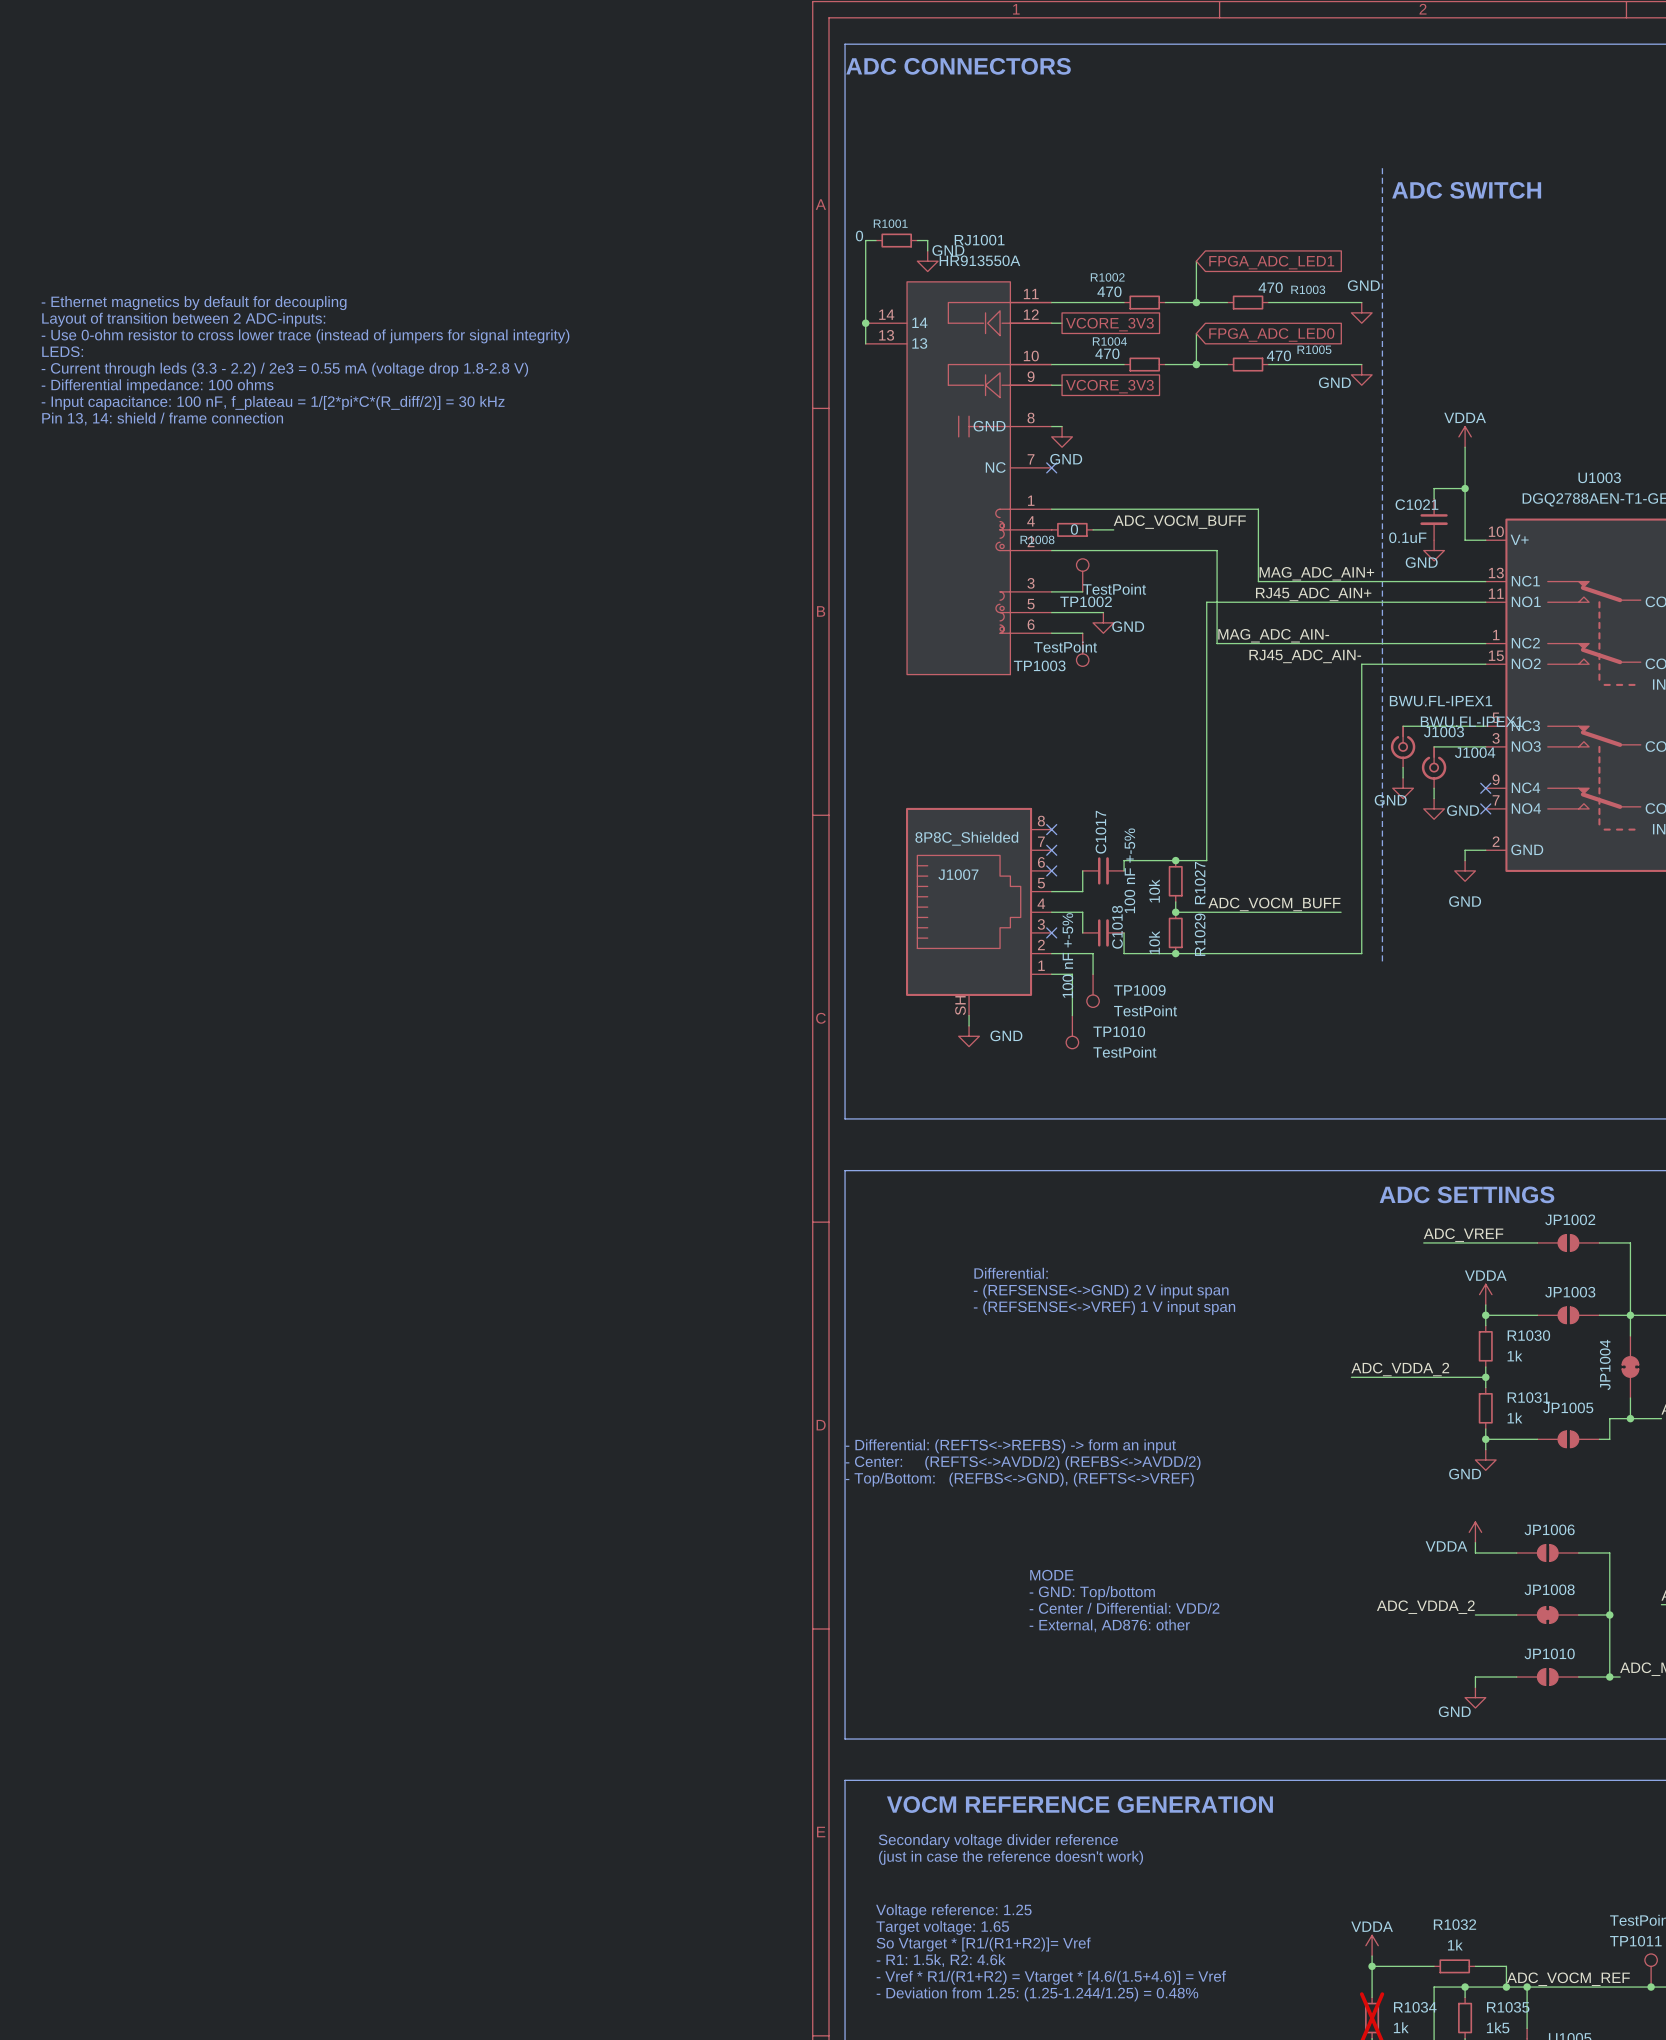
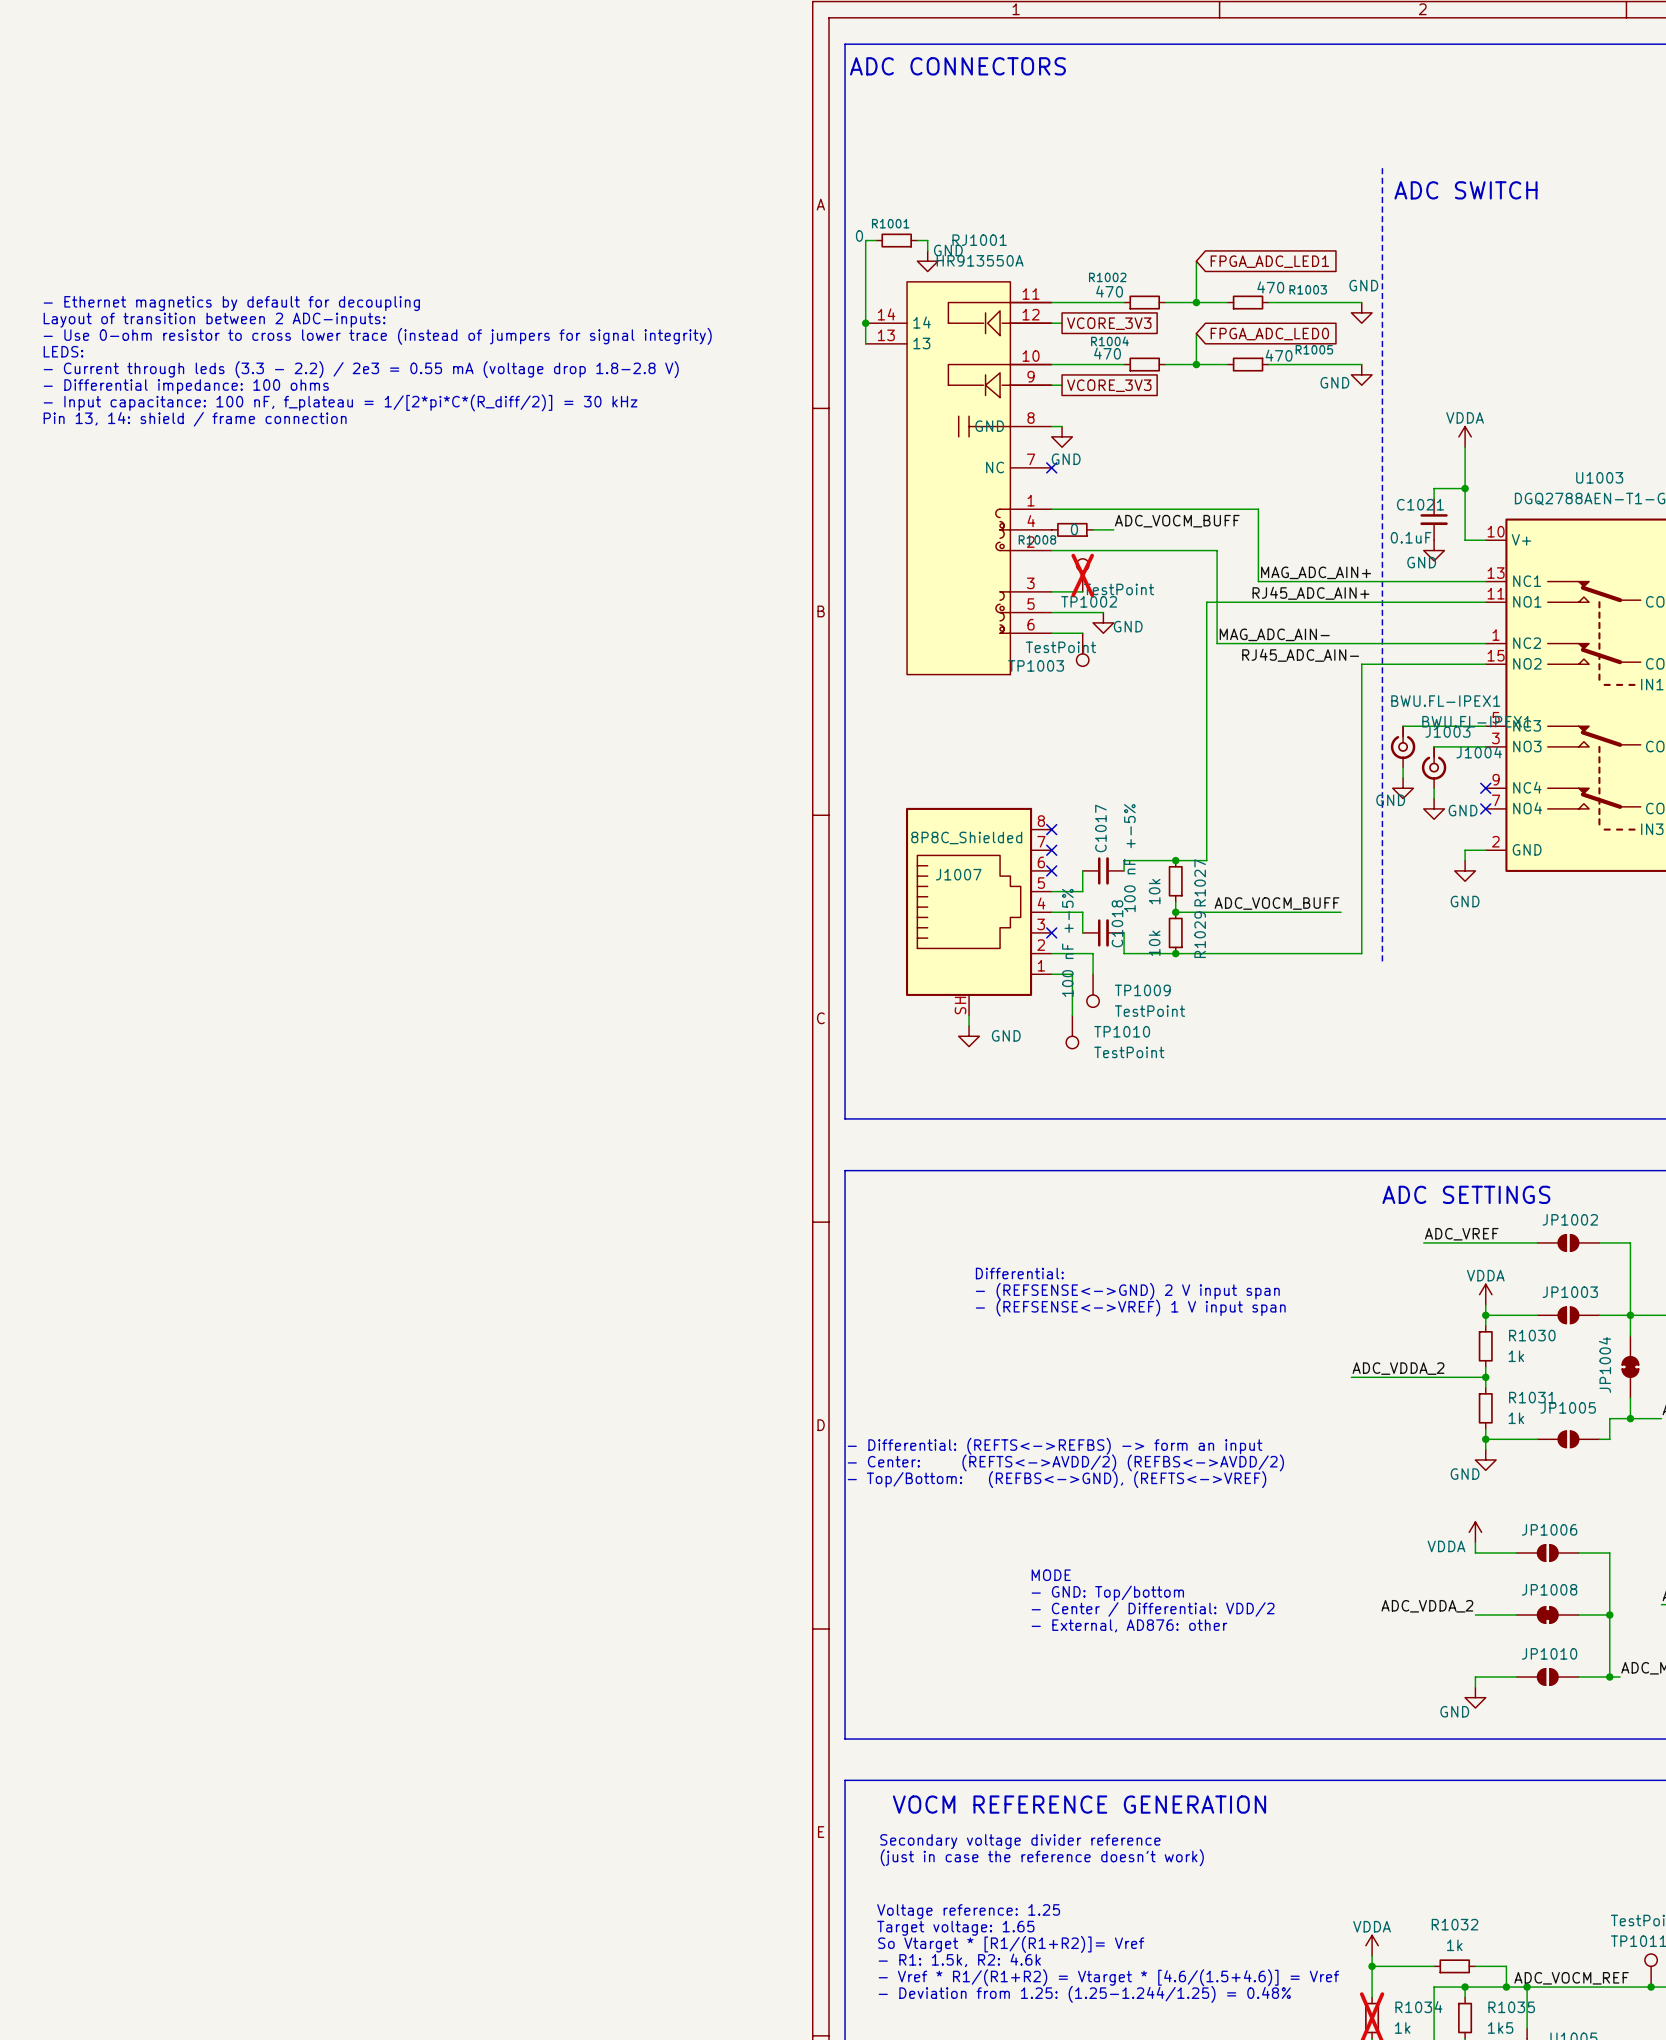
TP1002 do-not-place cross: none -> (1082, 575)

